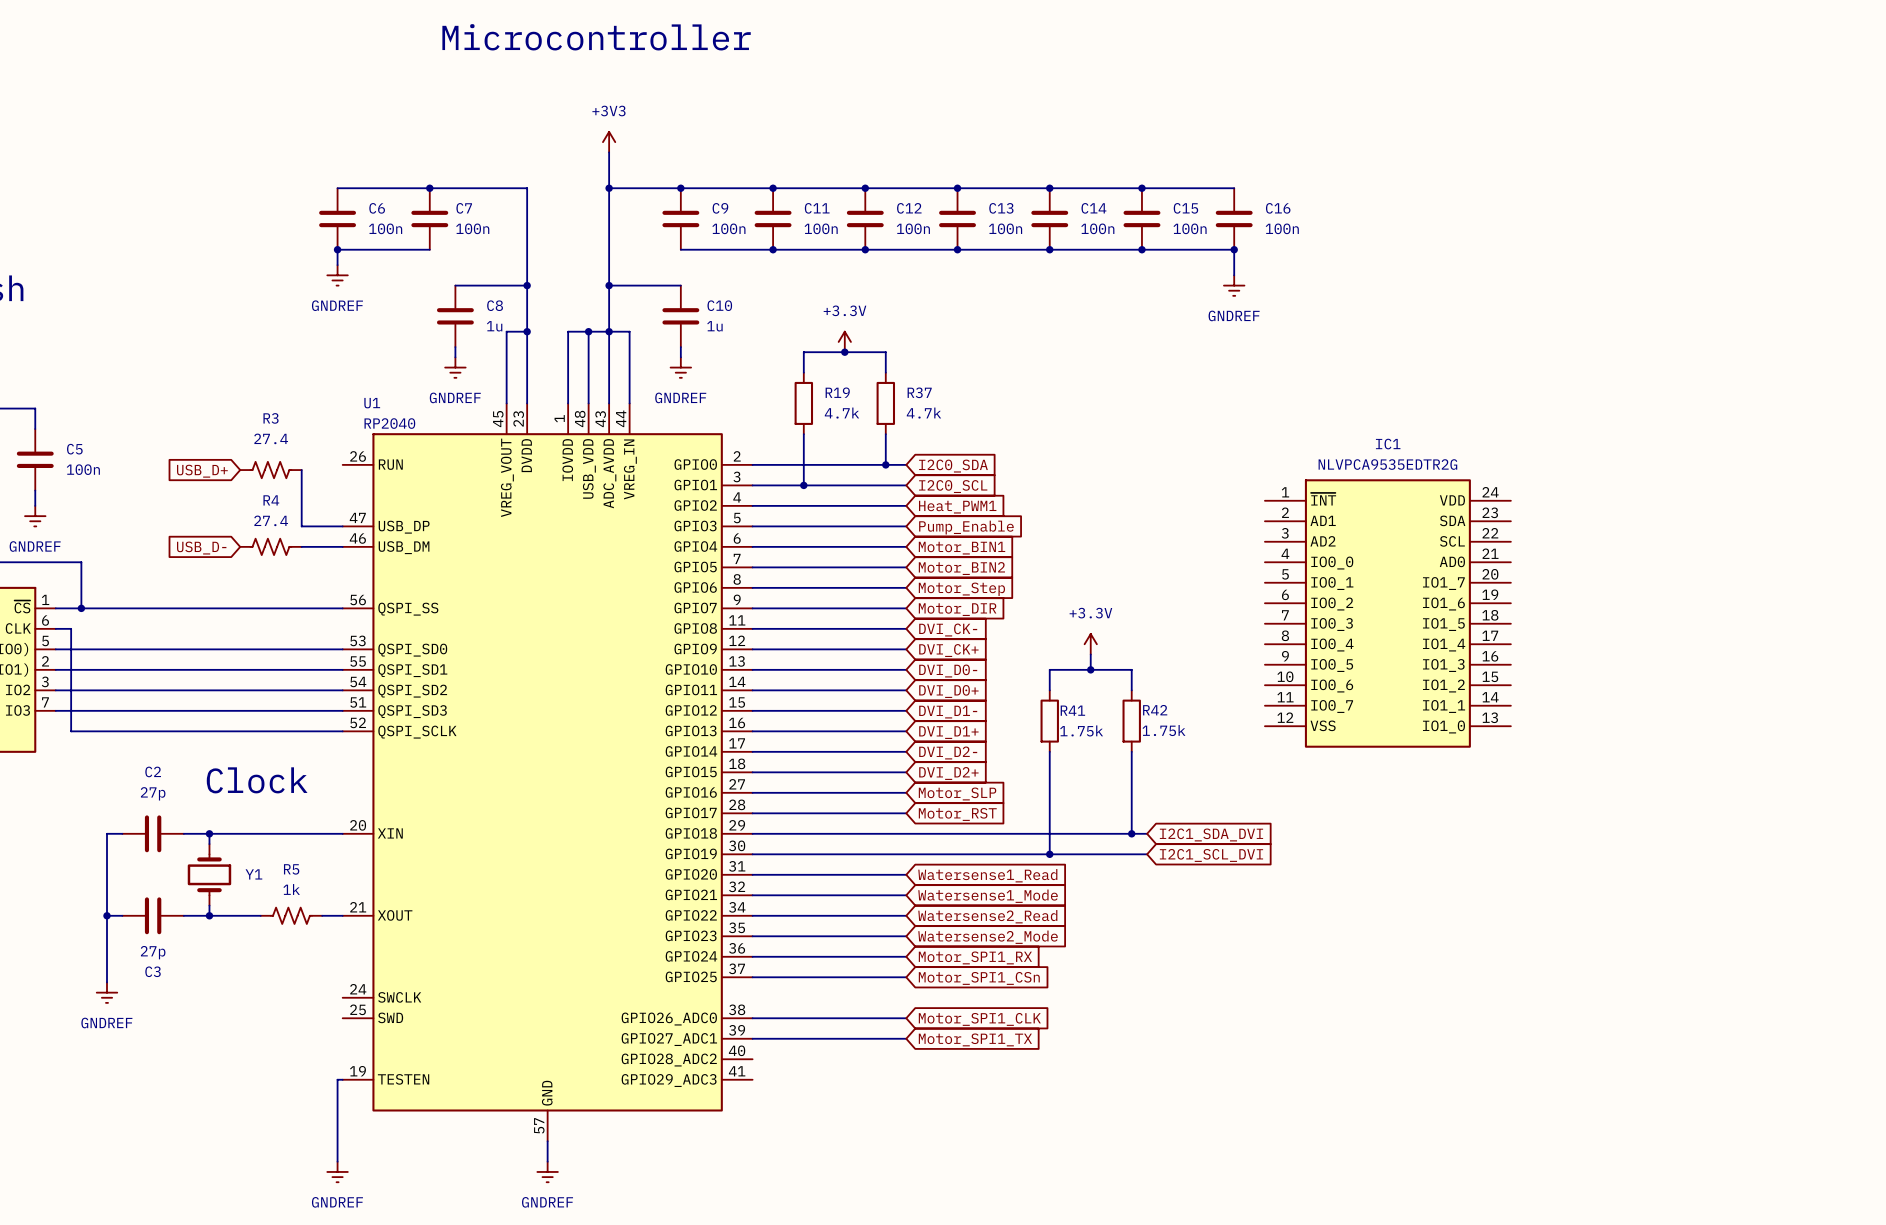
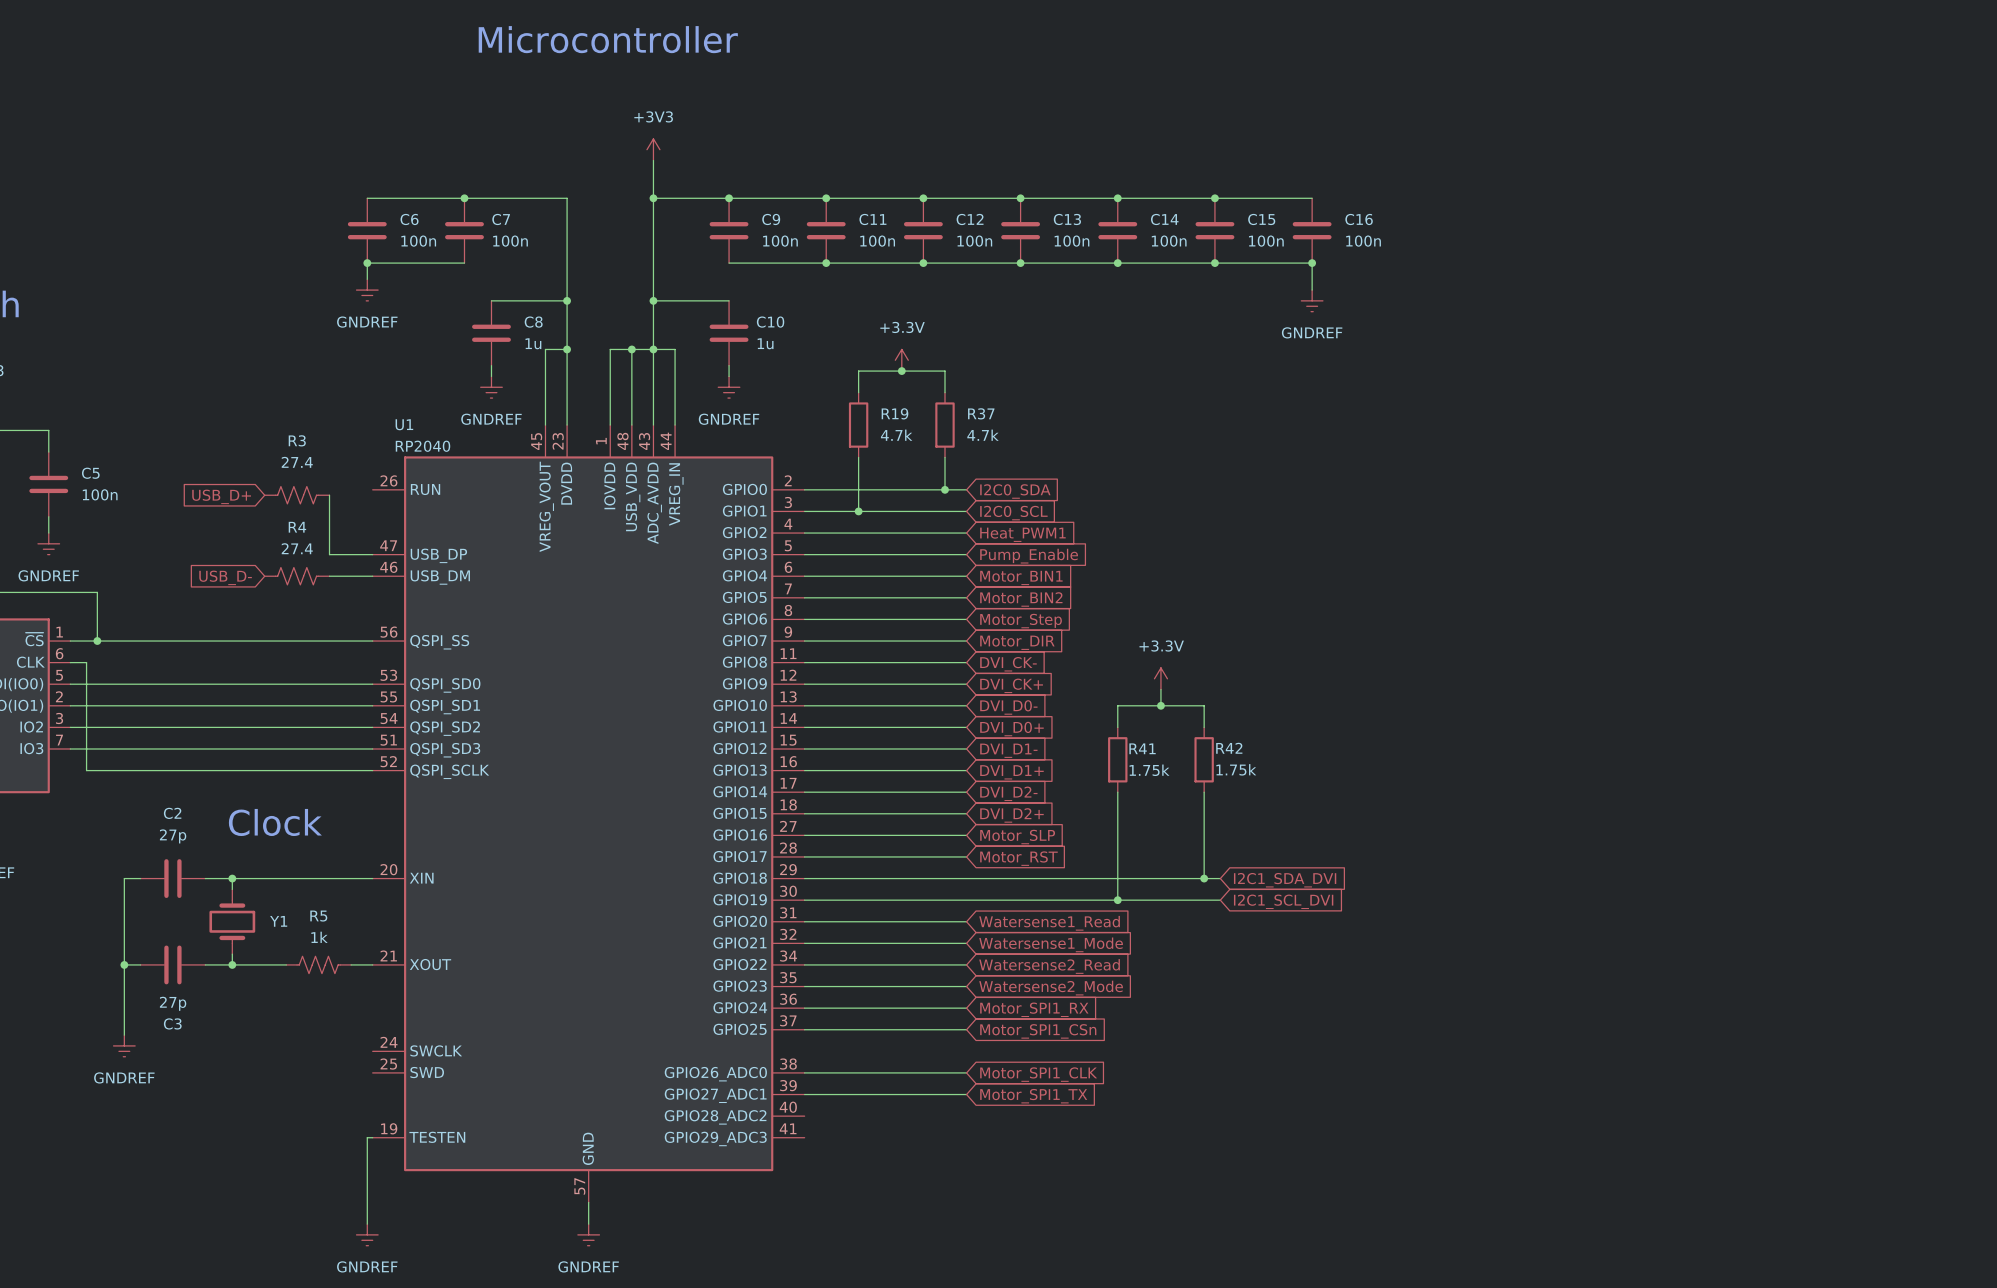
IC1: NLVPCA9535EDTR2G (1387, 613) -> none

